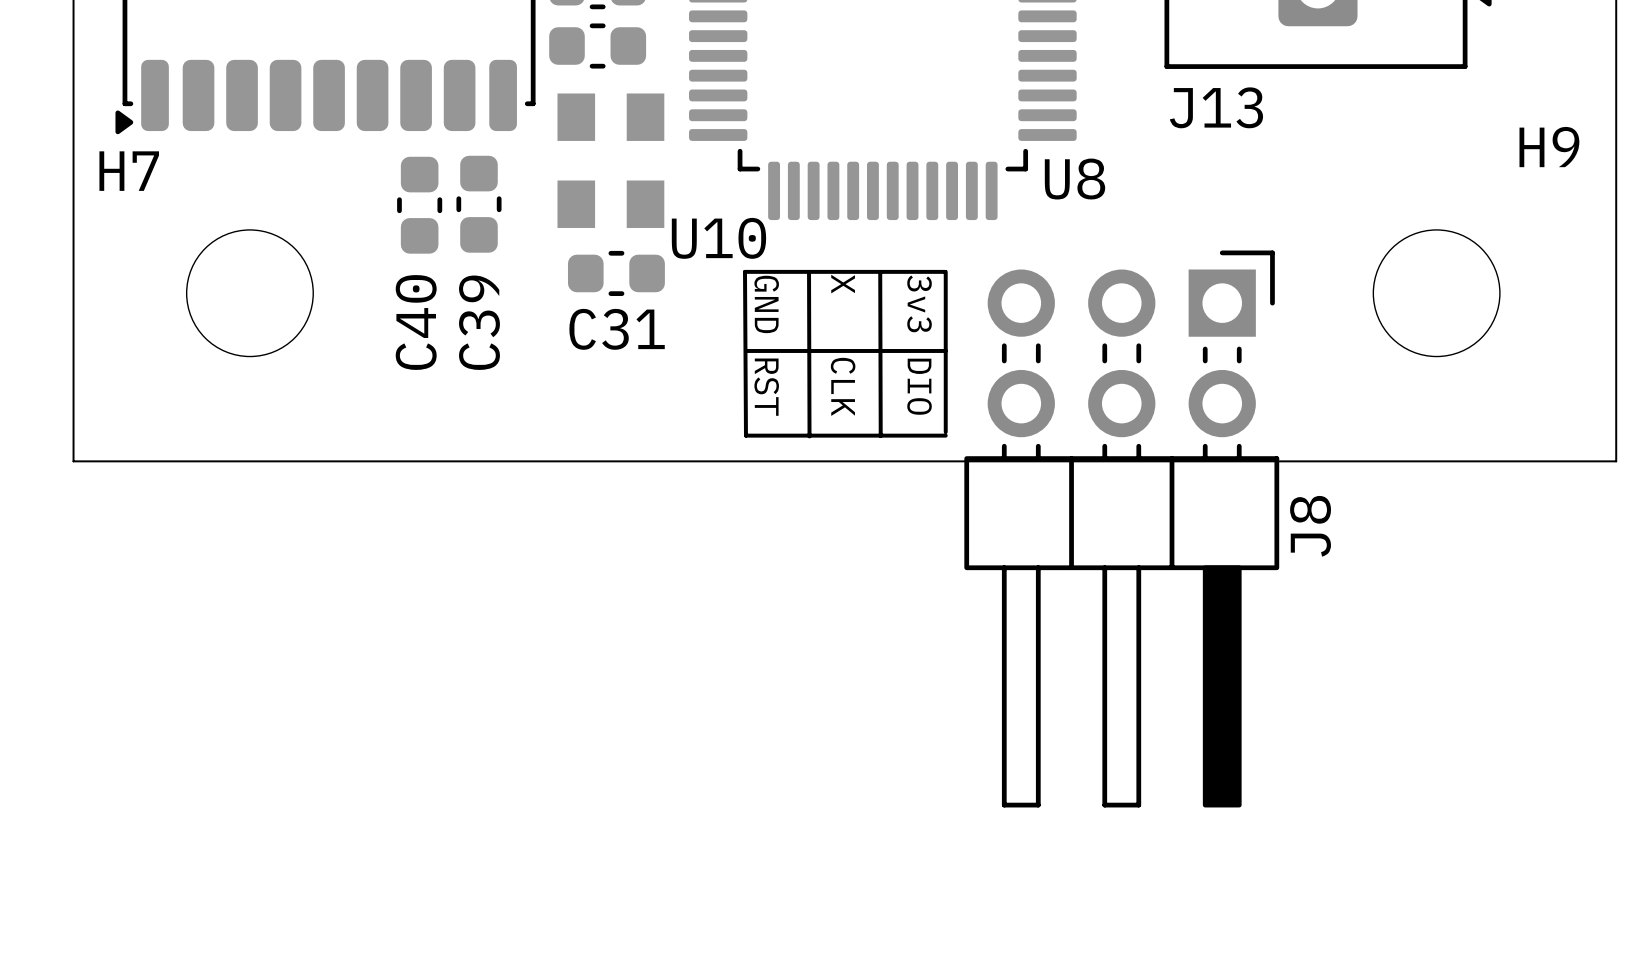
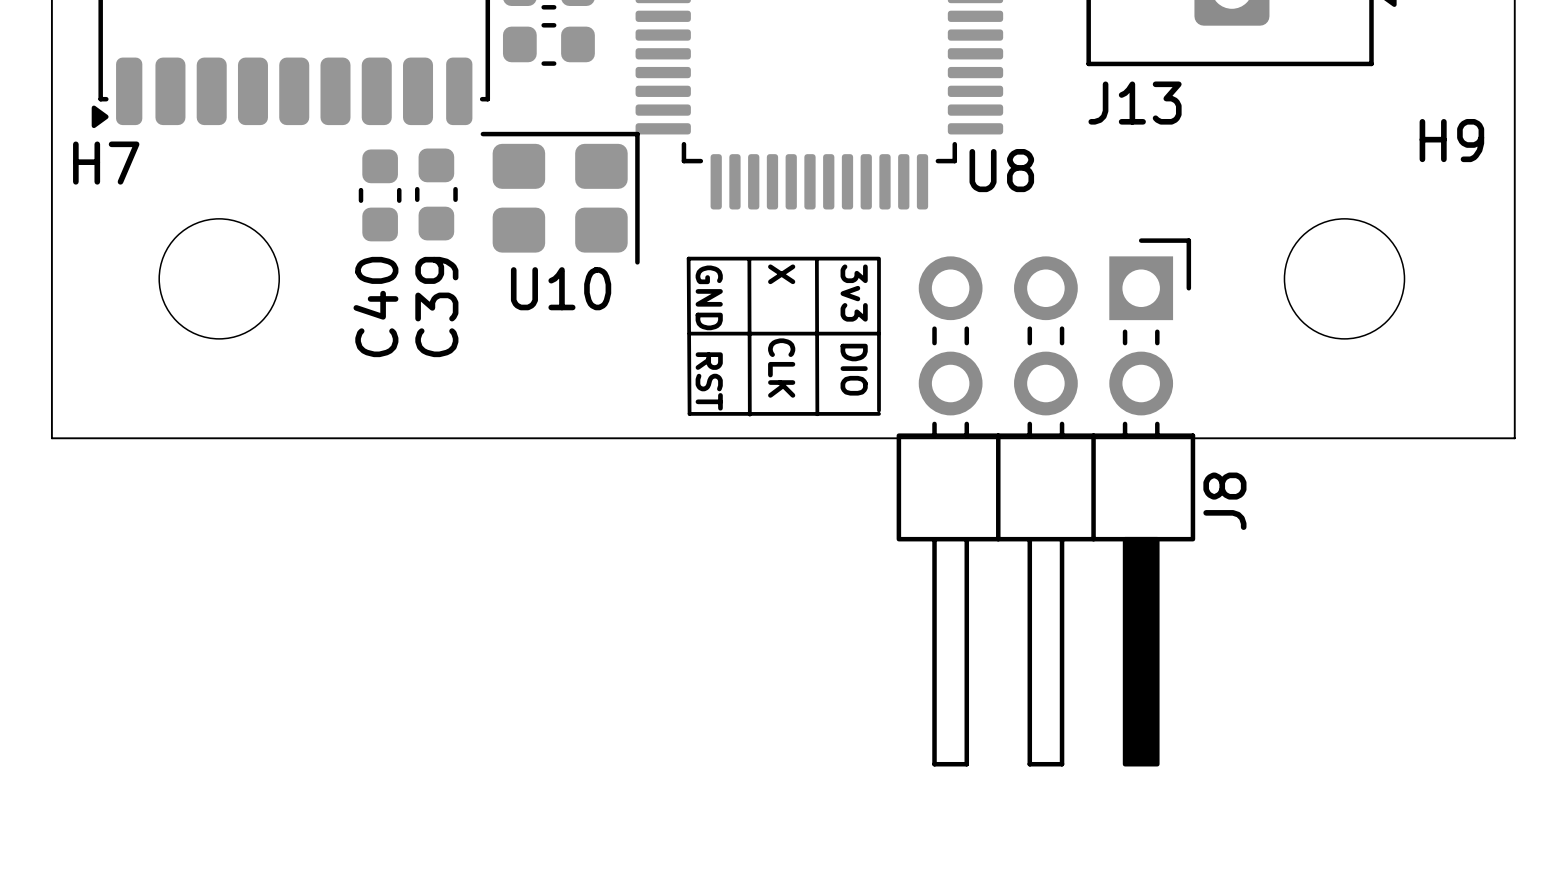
U10 footprint: [557, 93, 665, 228] -> [480, 131, 640, 265]
U10 name position: U10 (718, 238) -> U10 (561, 288)
C31: (616, 273) -> none

